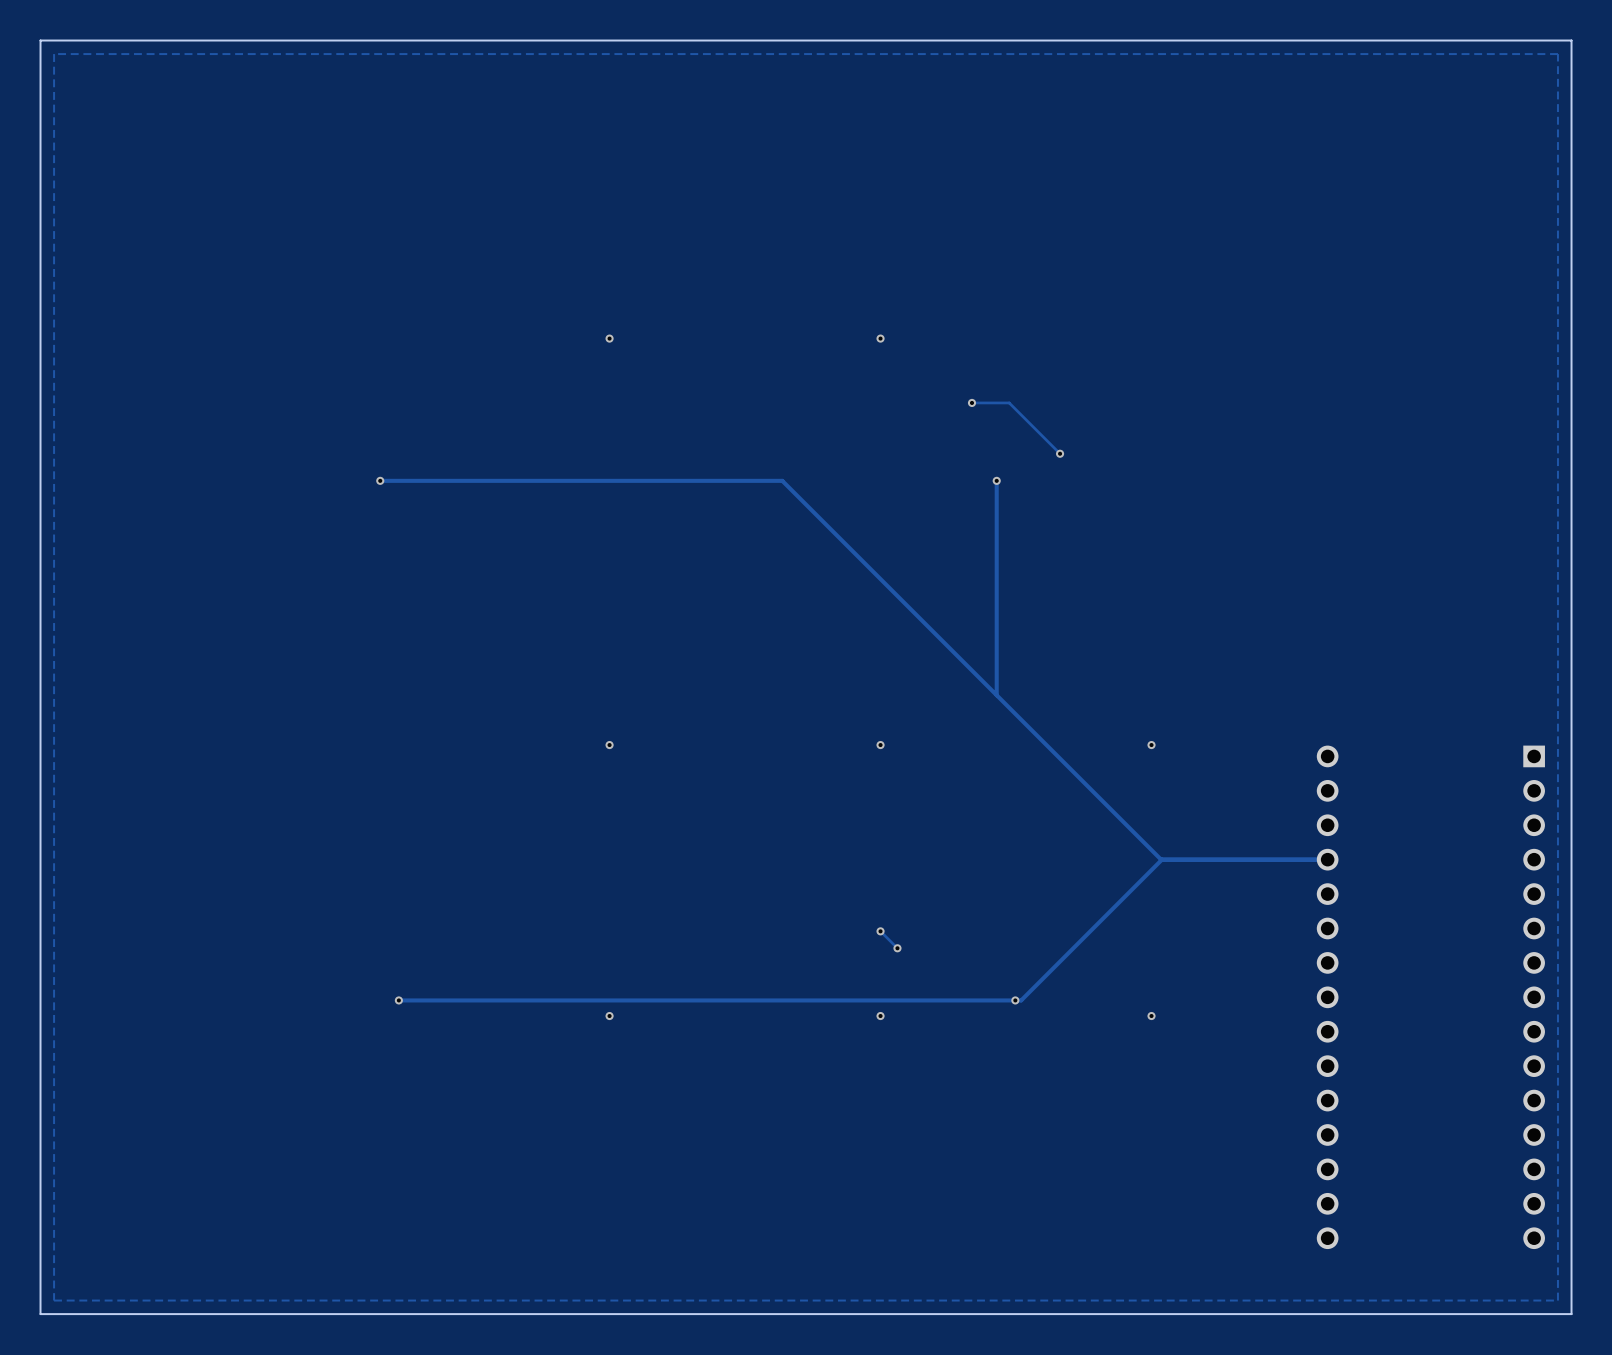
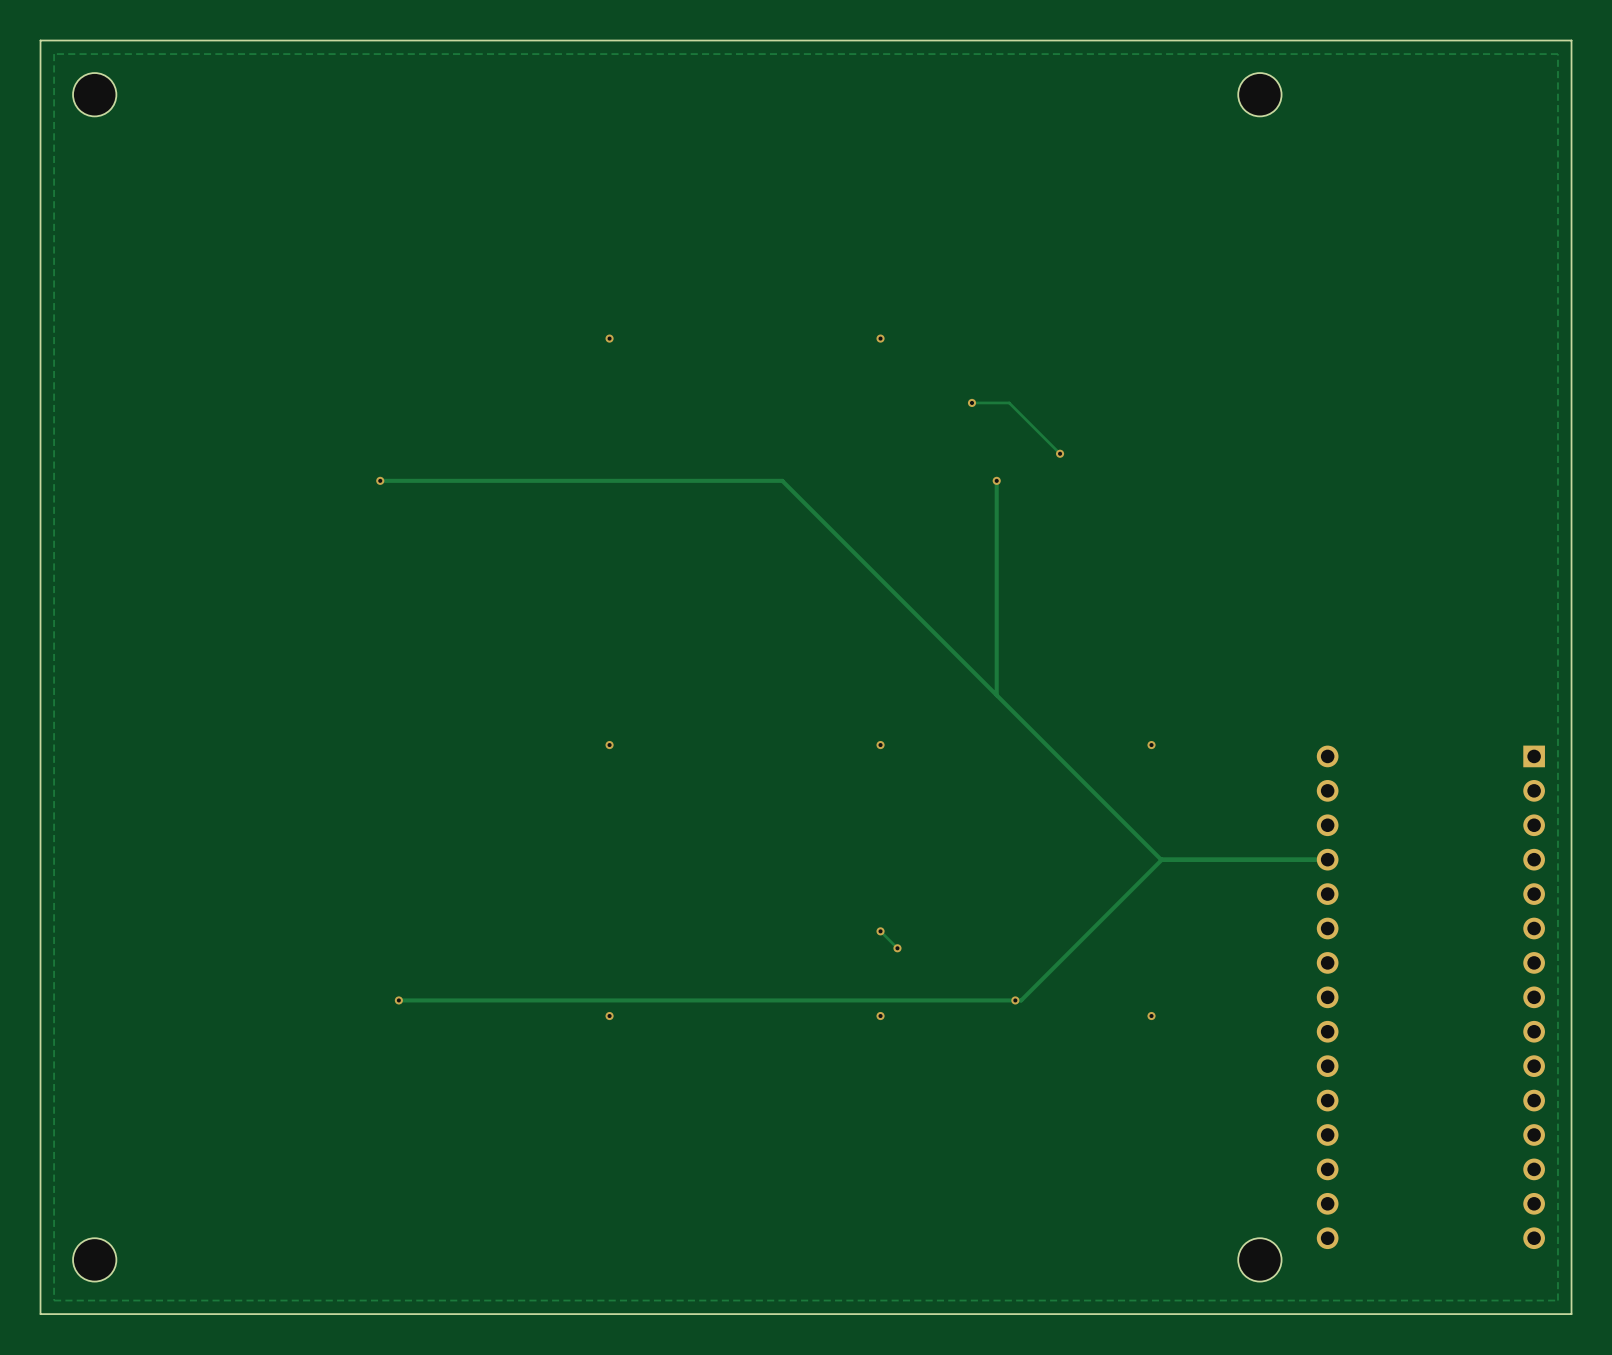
part: none -> (94, 94)
part: none -> (1259, 94)
part: none -> (94, 1259)
part: none -> (1259, 1259)

